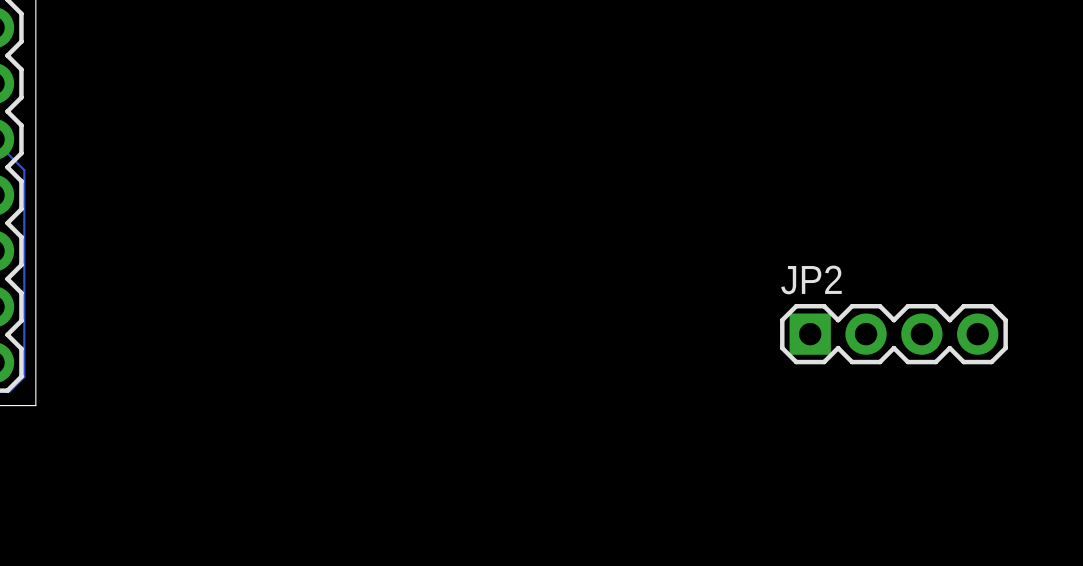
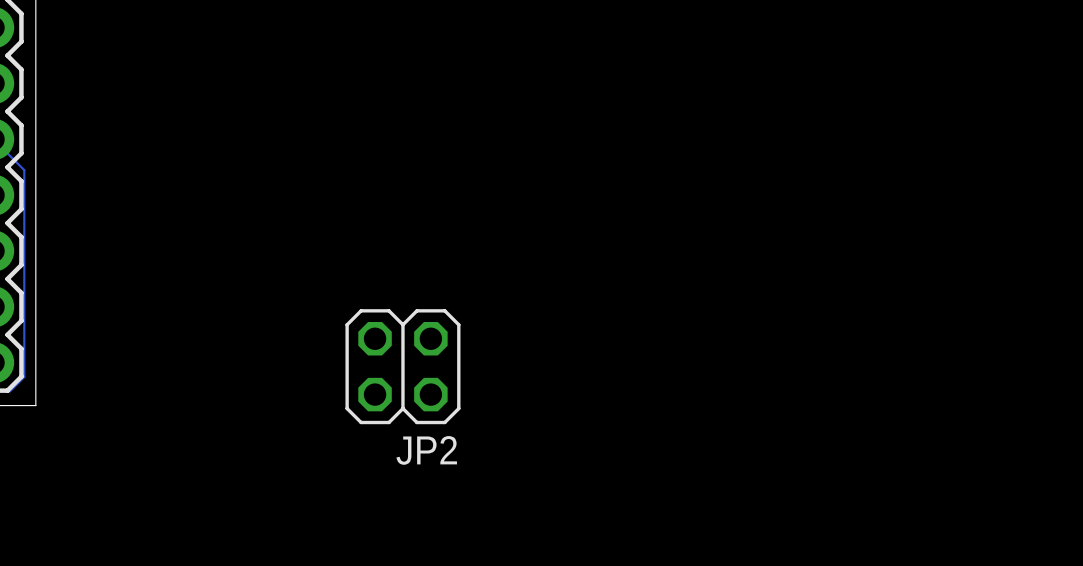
JP2 name position: JP2 (811, 279) -> JP2 (426, 450)
JP2 footprint: [780, 303, 1008, 365] -> [345, 309, 461, 425]

